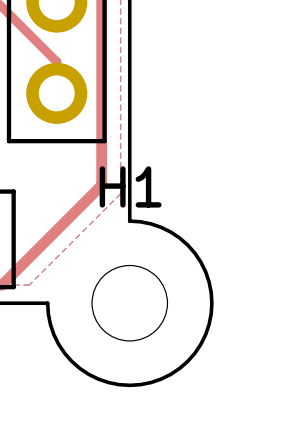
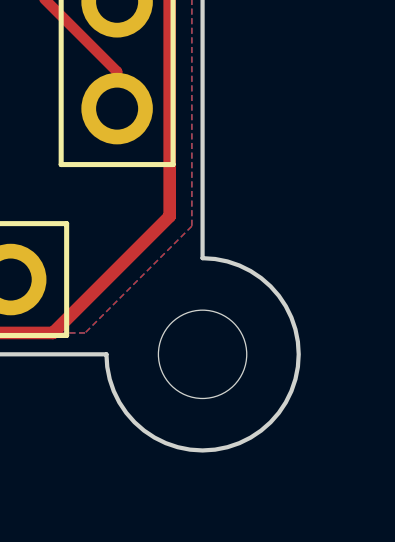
H1 name: H1 (130, 186) -> none

